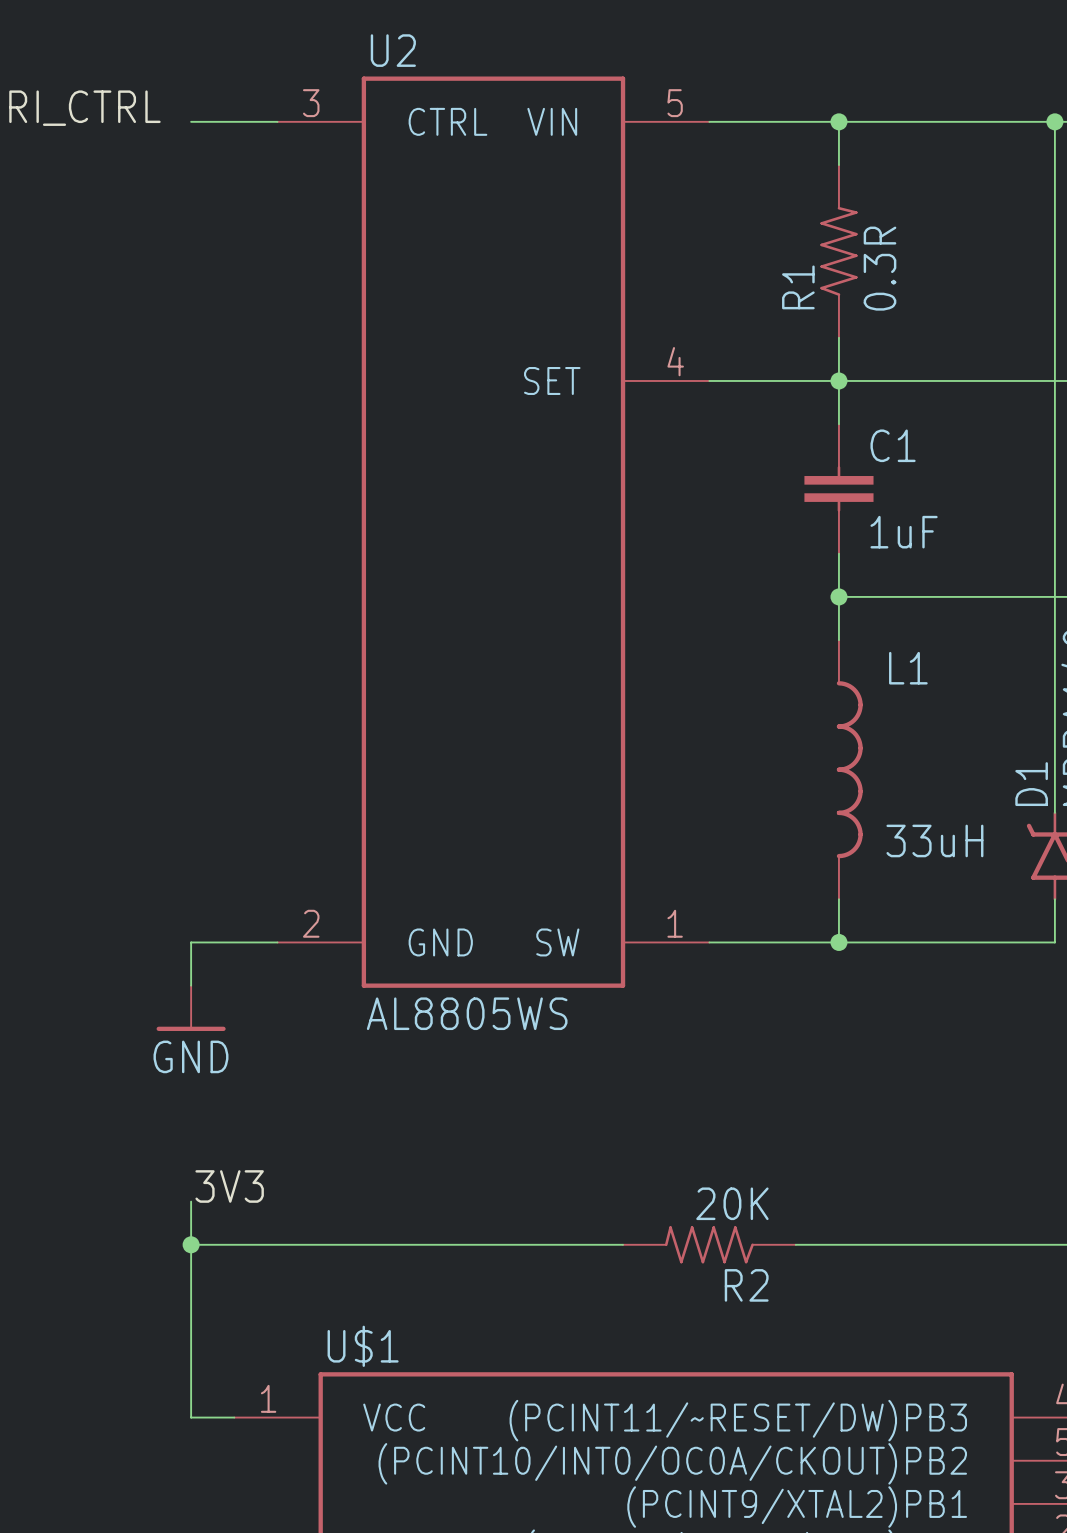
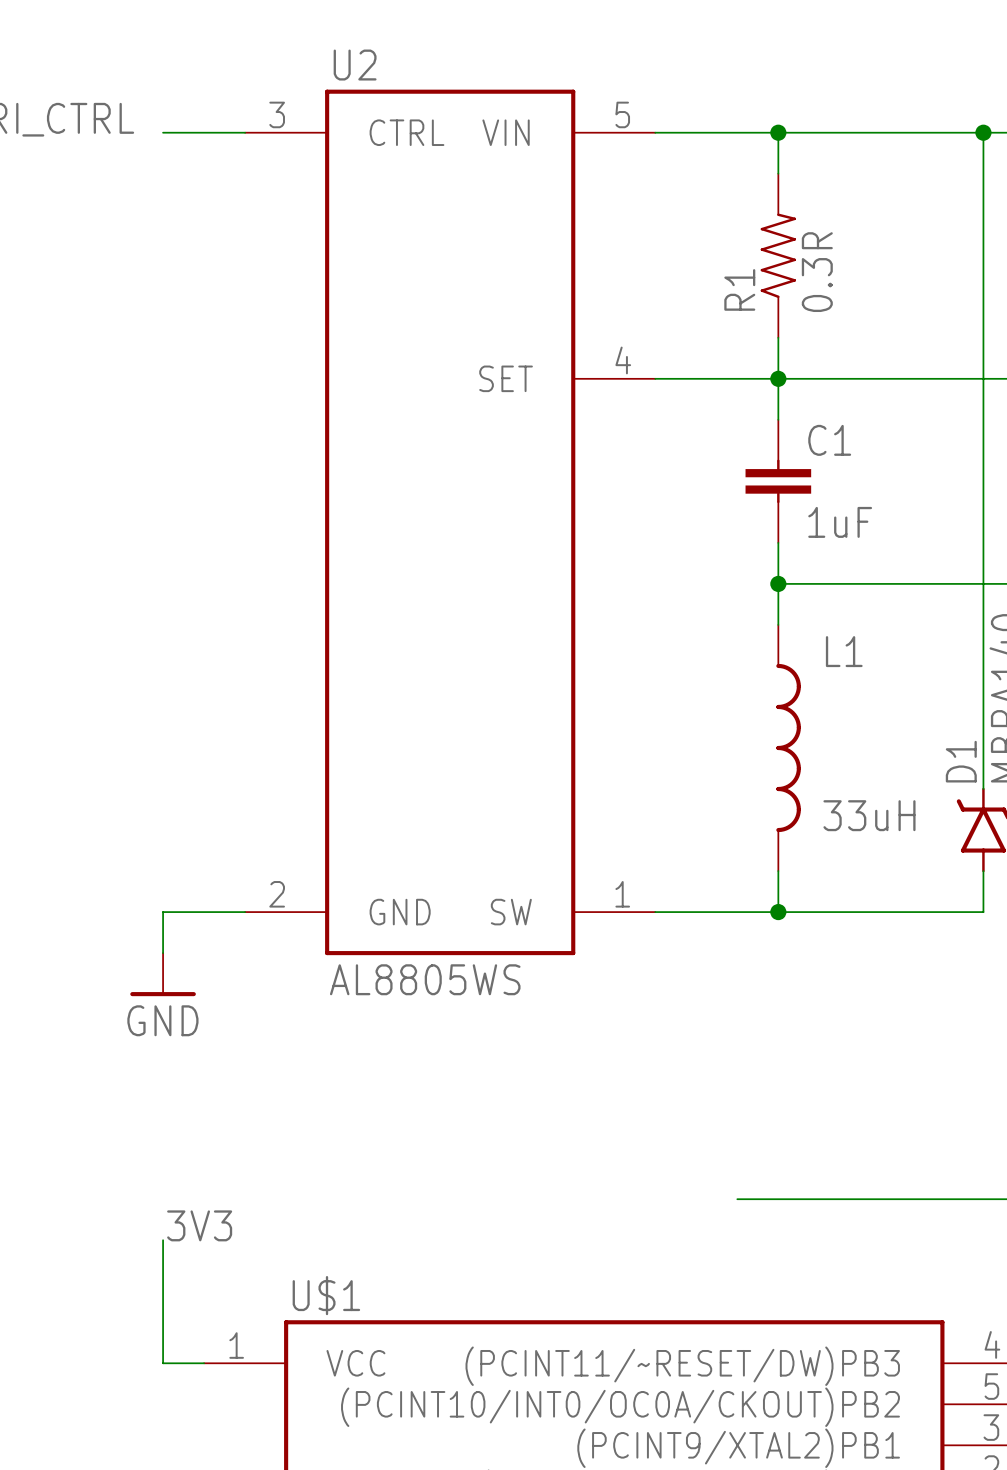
label position: 3V3 (229, 1186) -> 3V3 (199, 1225)
wire: (191, 1201) (191, 1287) -> none
wire: (191, 1244) (623, 1244) -> none
junction: (191, 1244) -> none
R2: 20K (709, 1244) -> none

